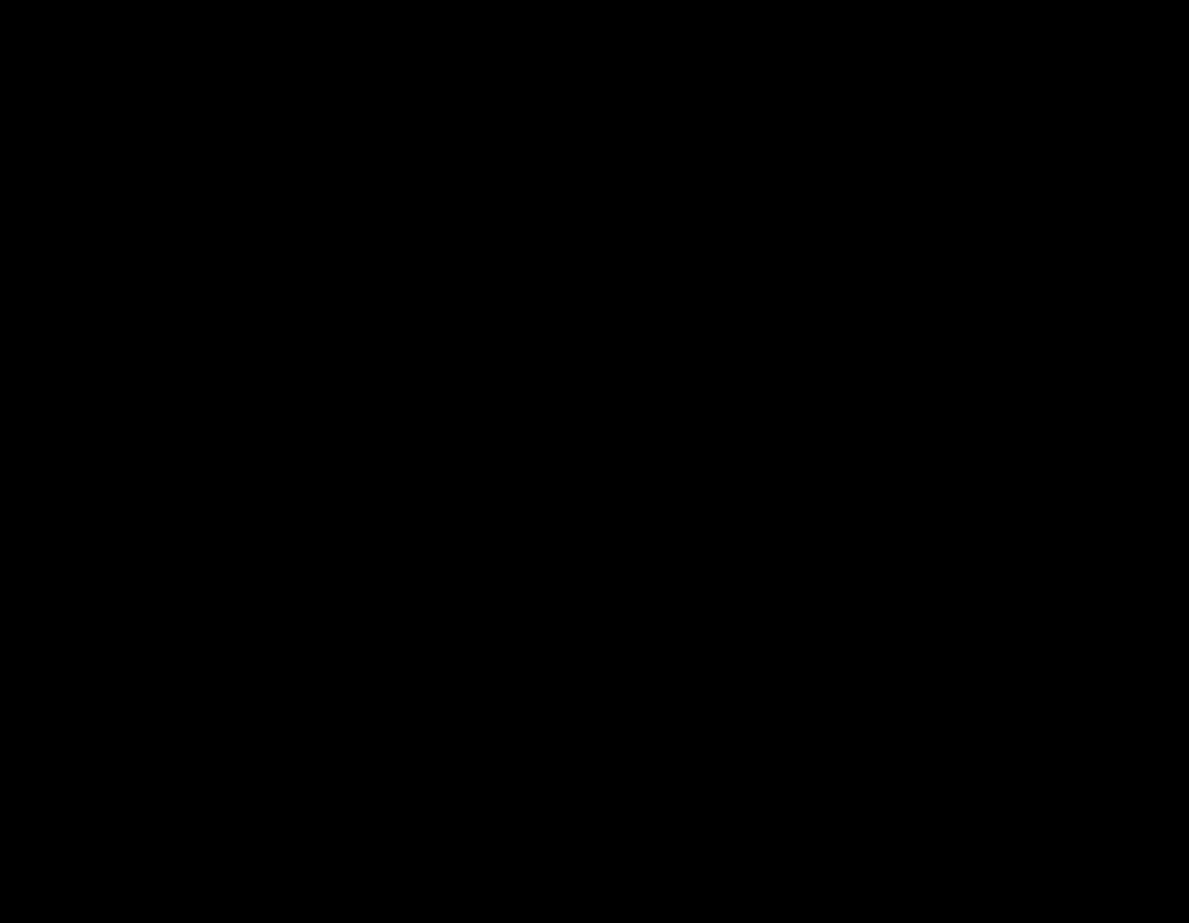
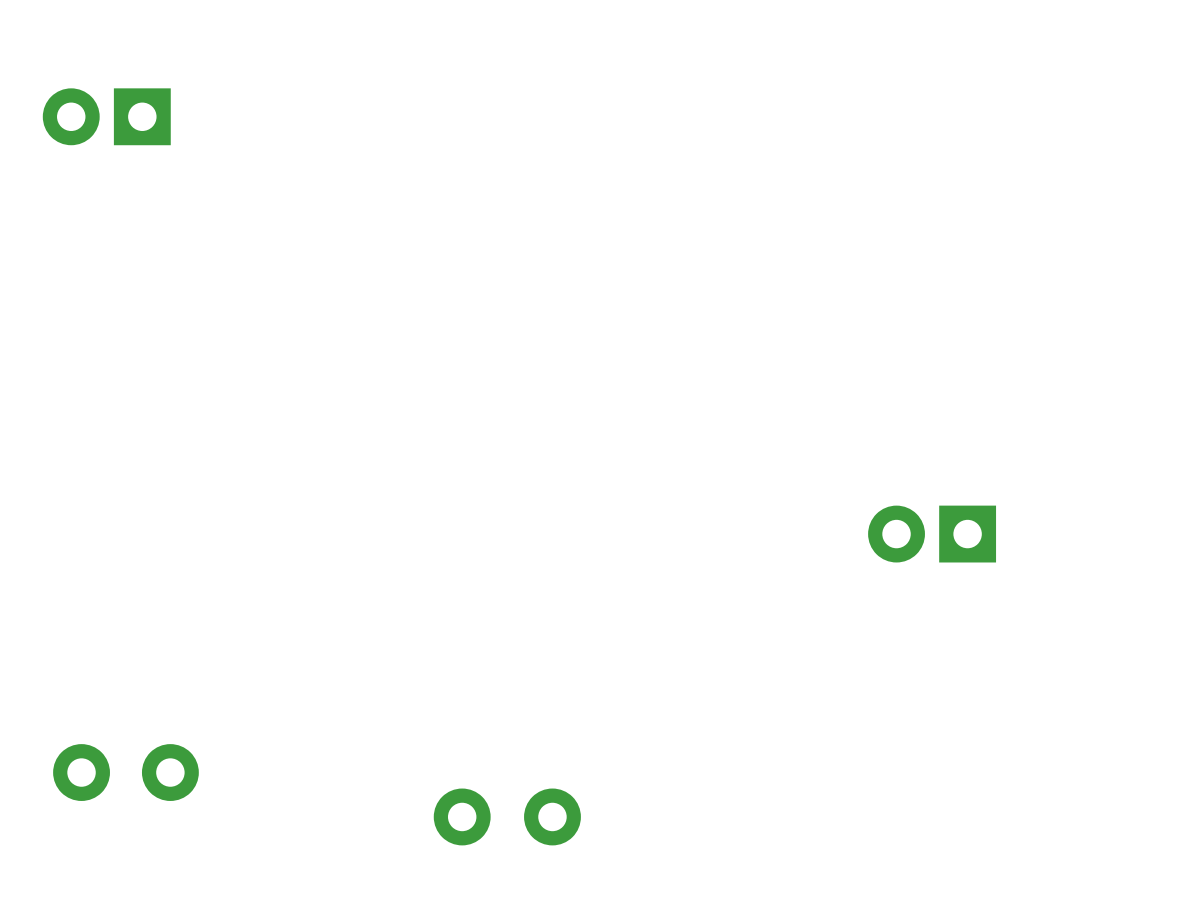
part: none -> (106, 116)
part: none -> (932, 534)
part: none -> (125, 772)
part: none -> (507, 816)

